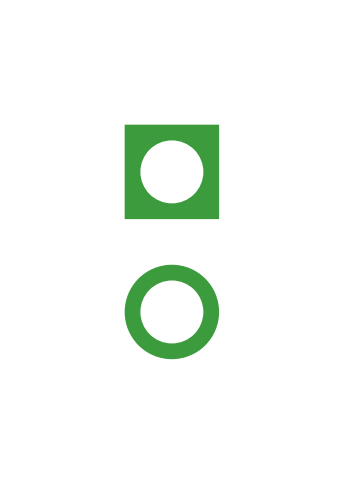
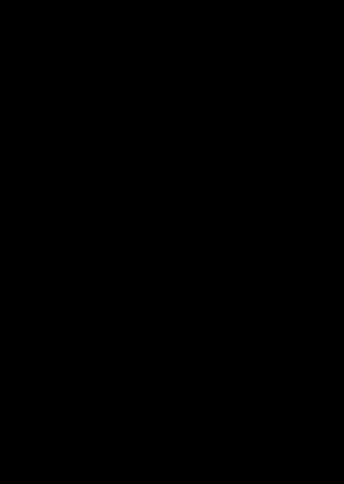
part: (171, 241) -> none

